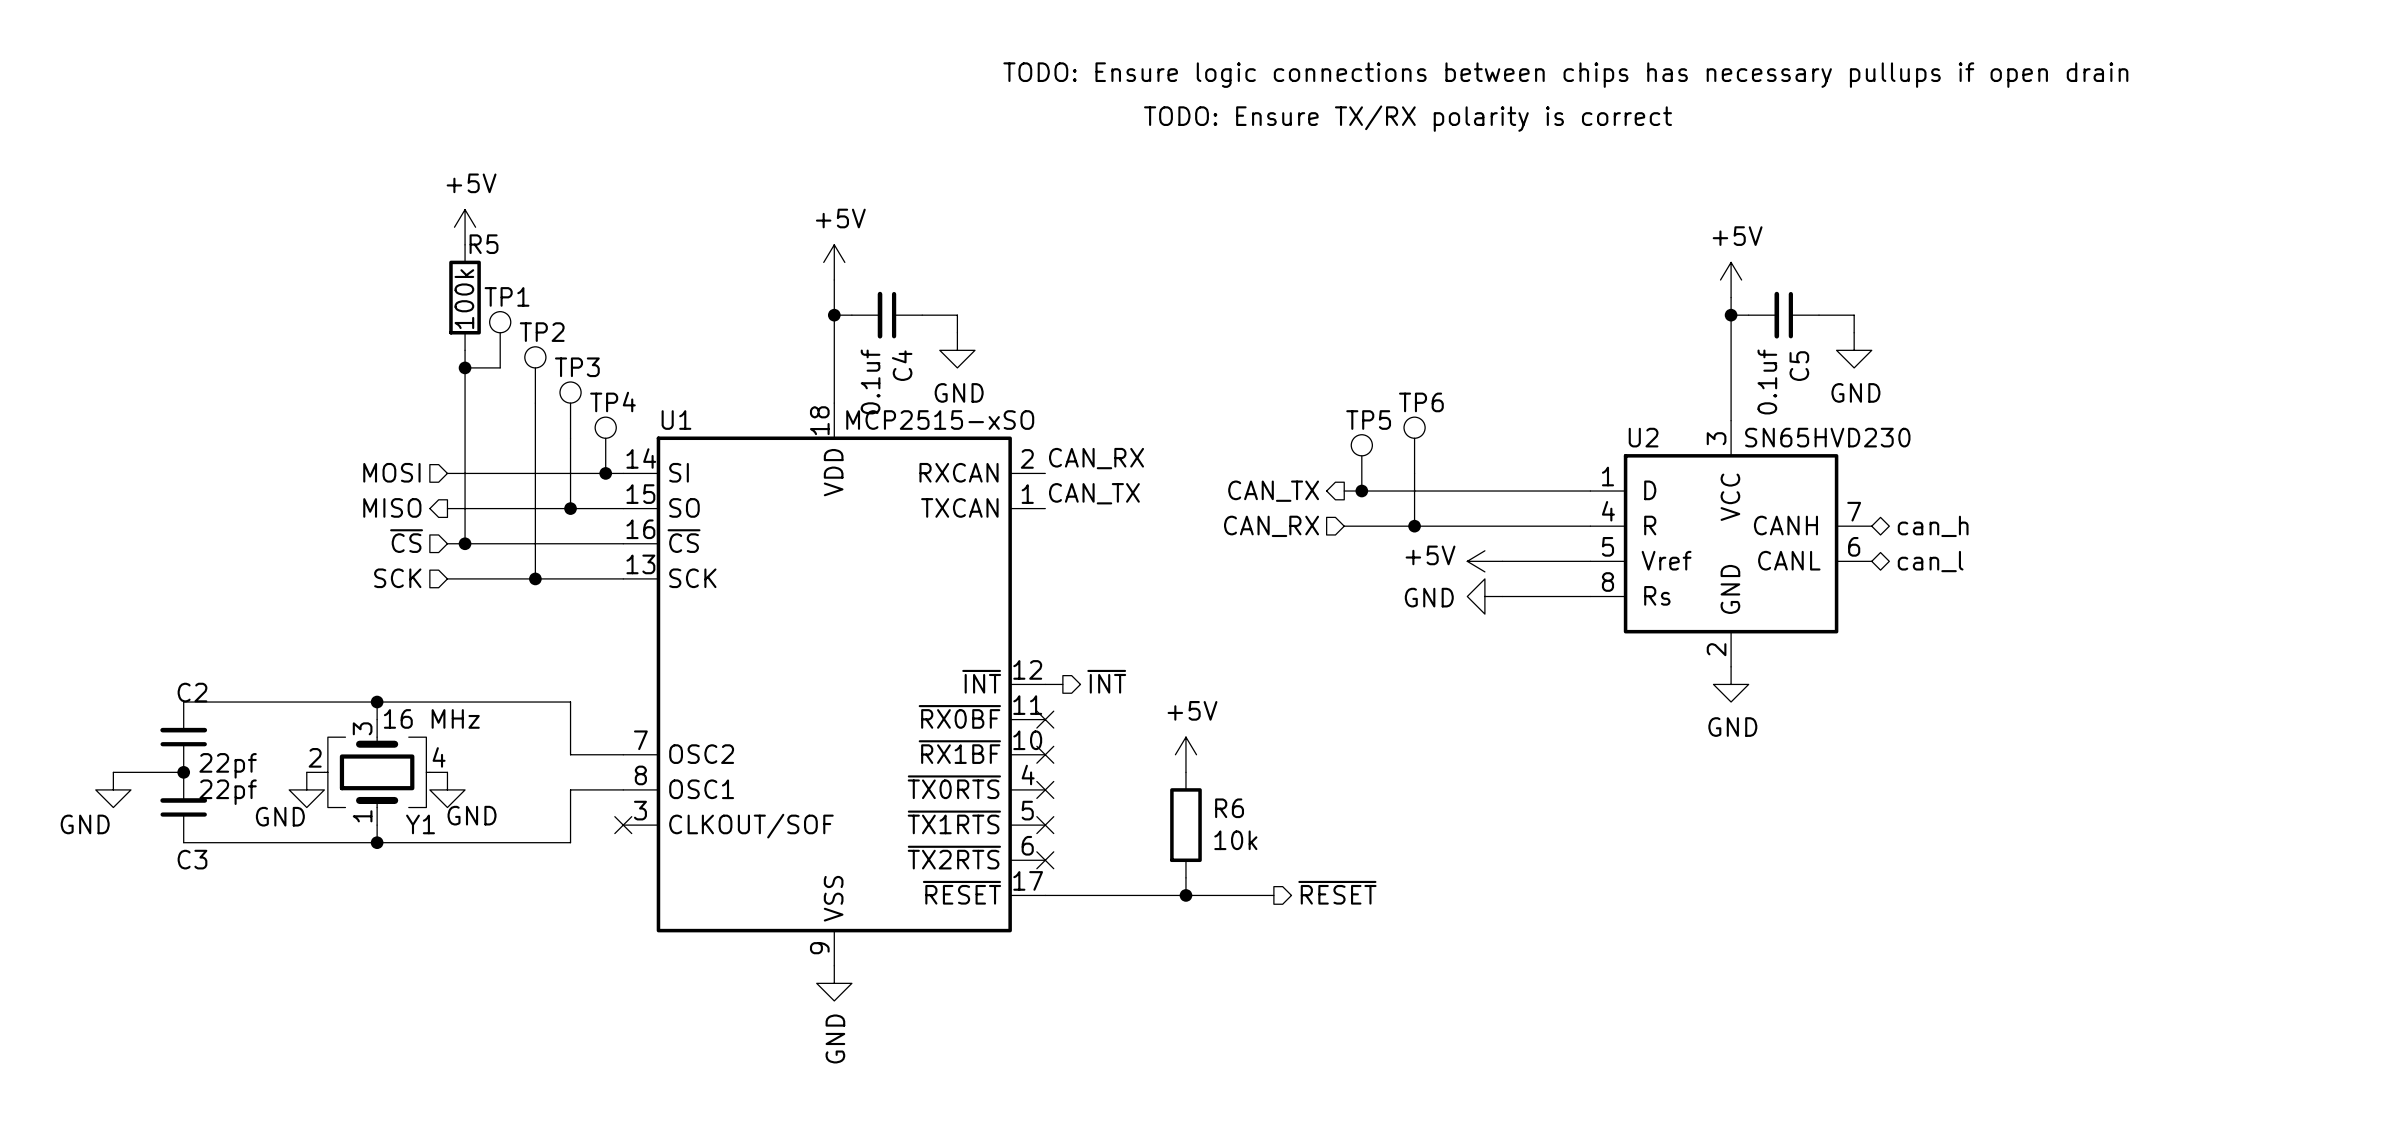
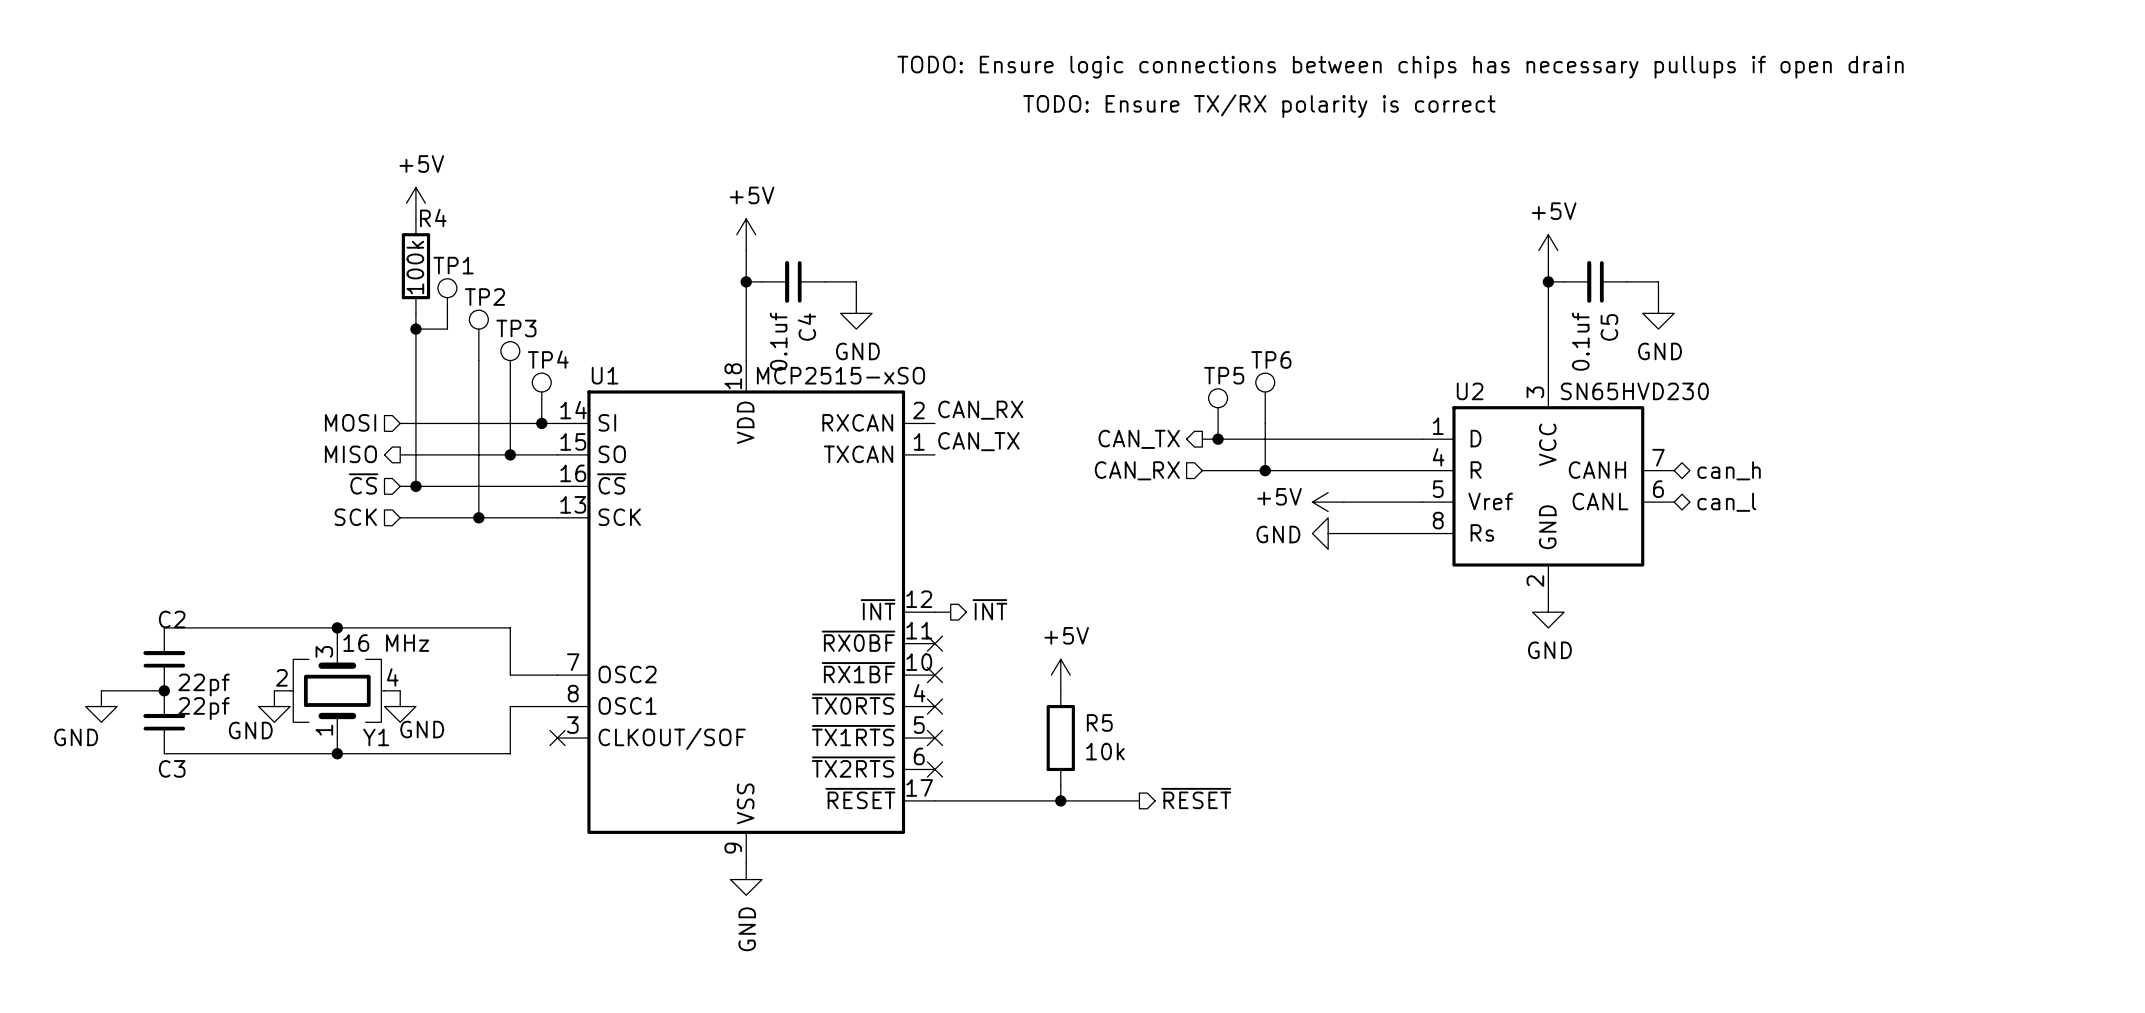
R5 name: R5 (484, 244) -> R4 (433, 218)
R6 name: R6 (1229, 808) -> R5 (1099, 722)

